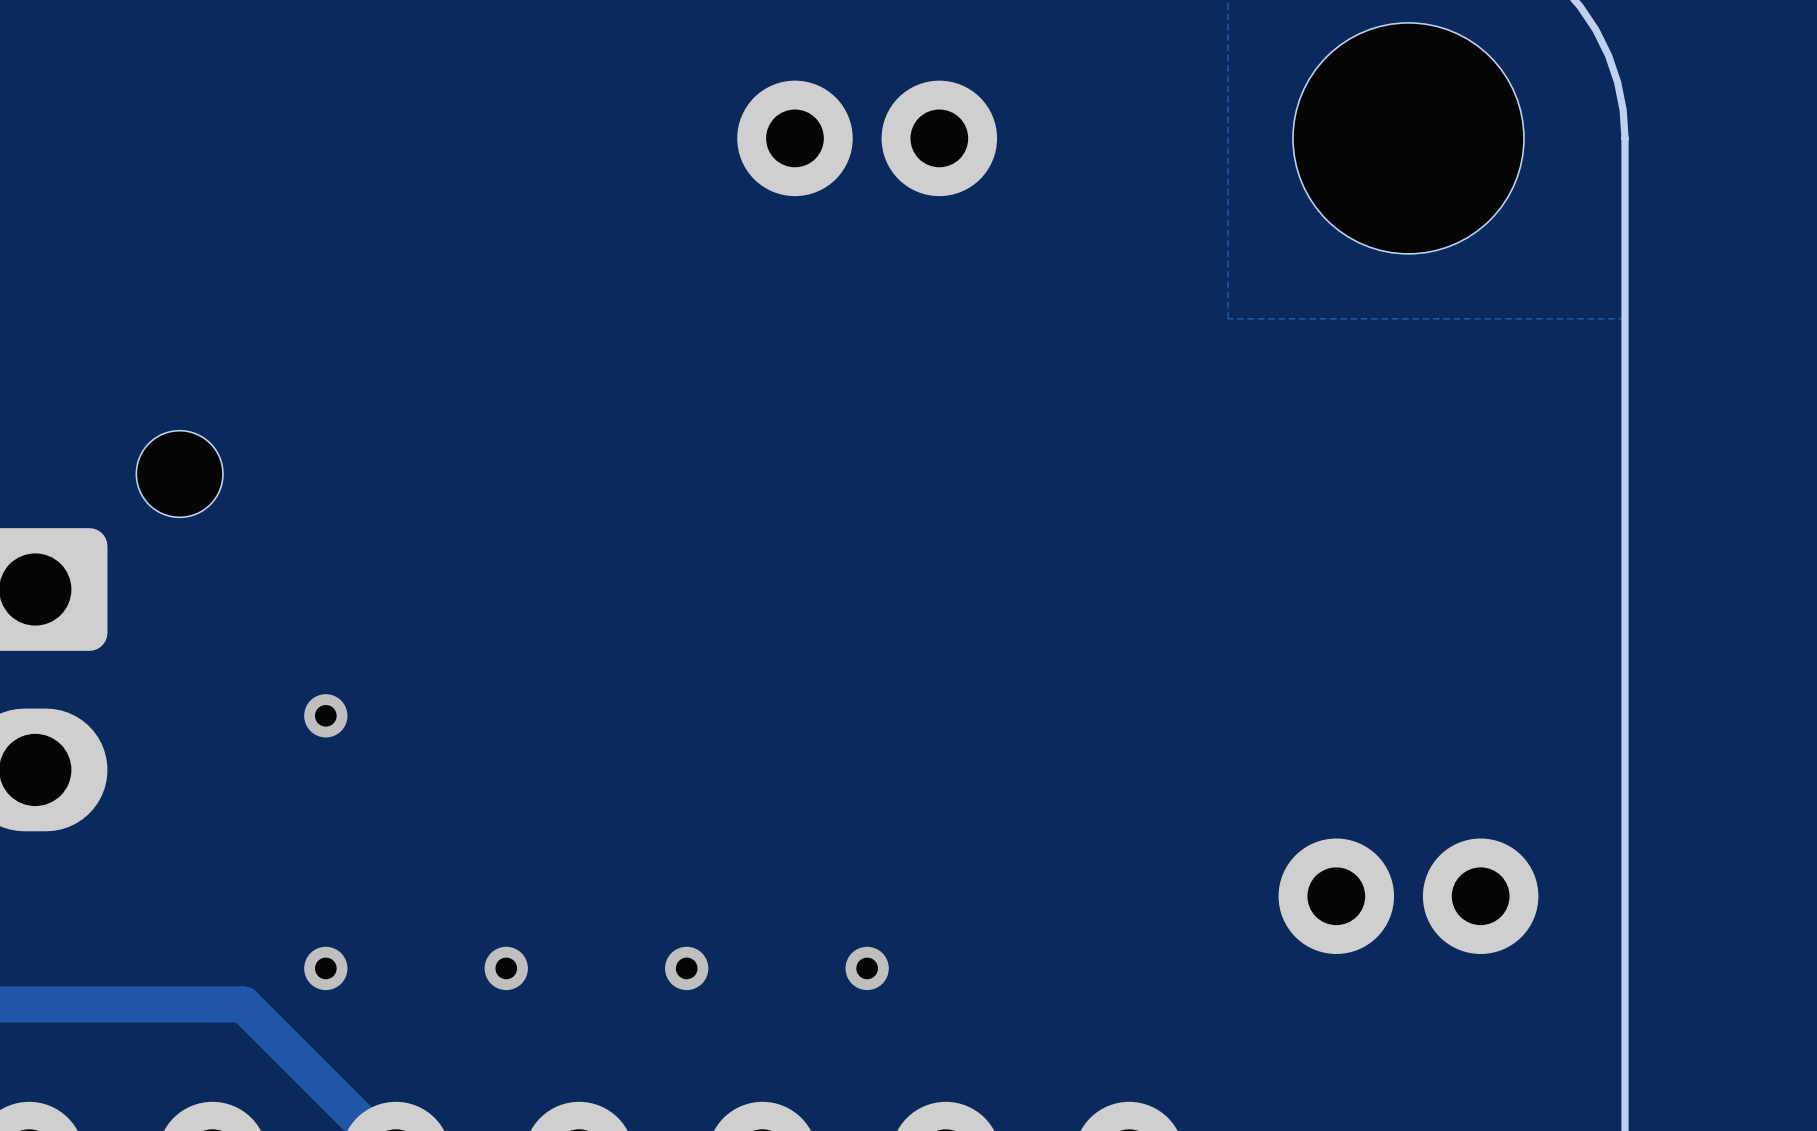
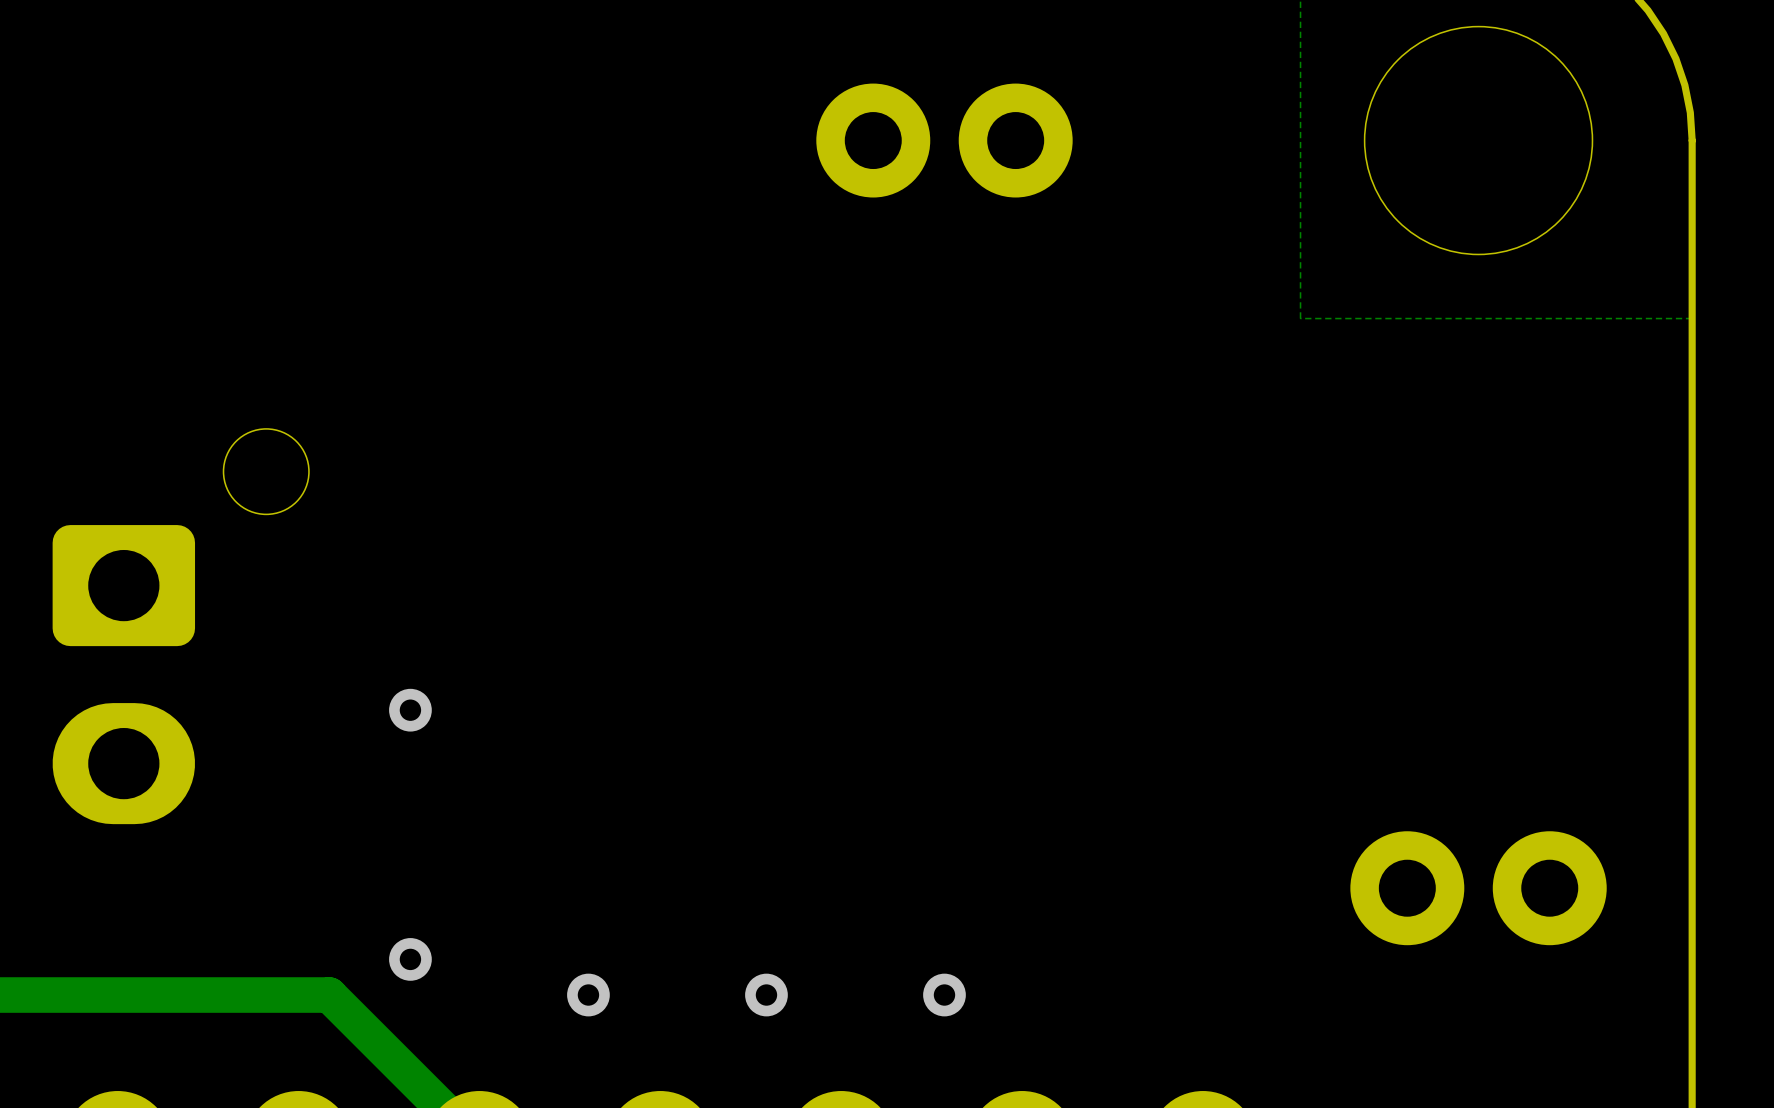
via position: (506, 968) -> (588, 995)
via position: (686, 968) -> (766, 995)
via position: (867, 968) -> (944, 995)

